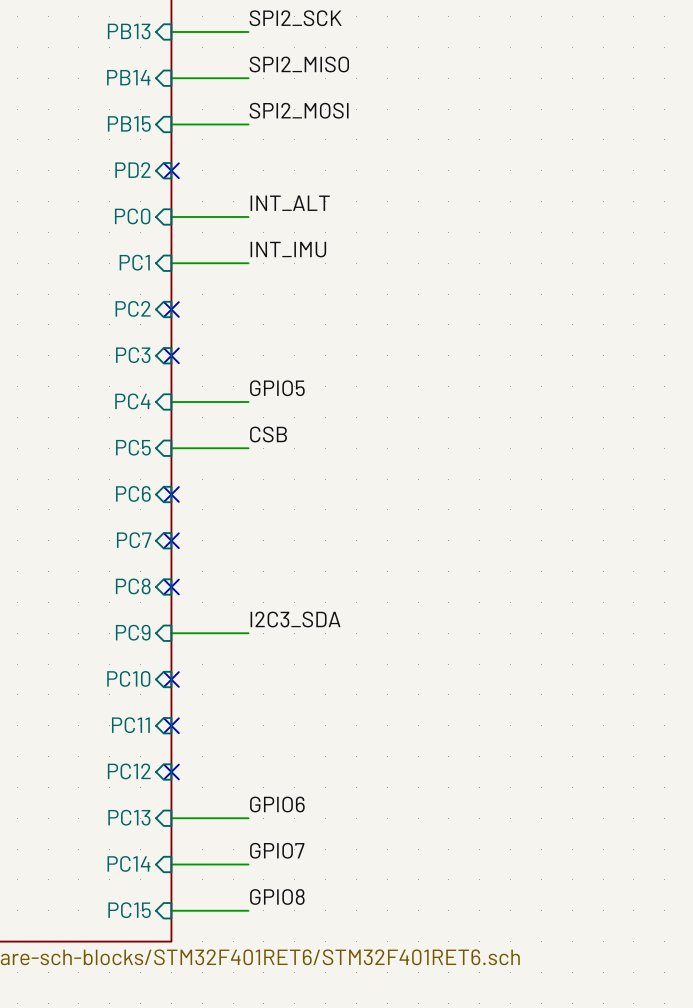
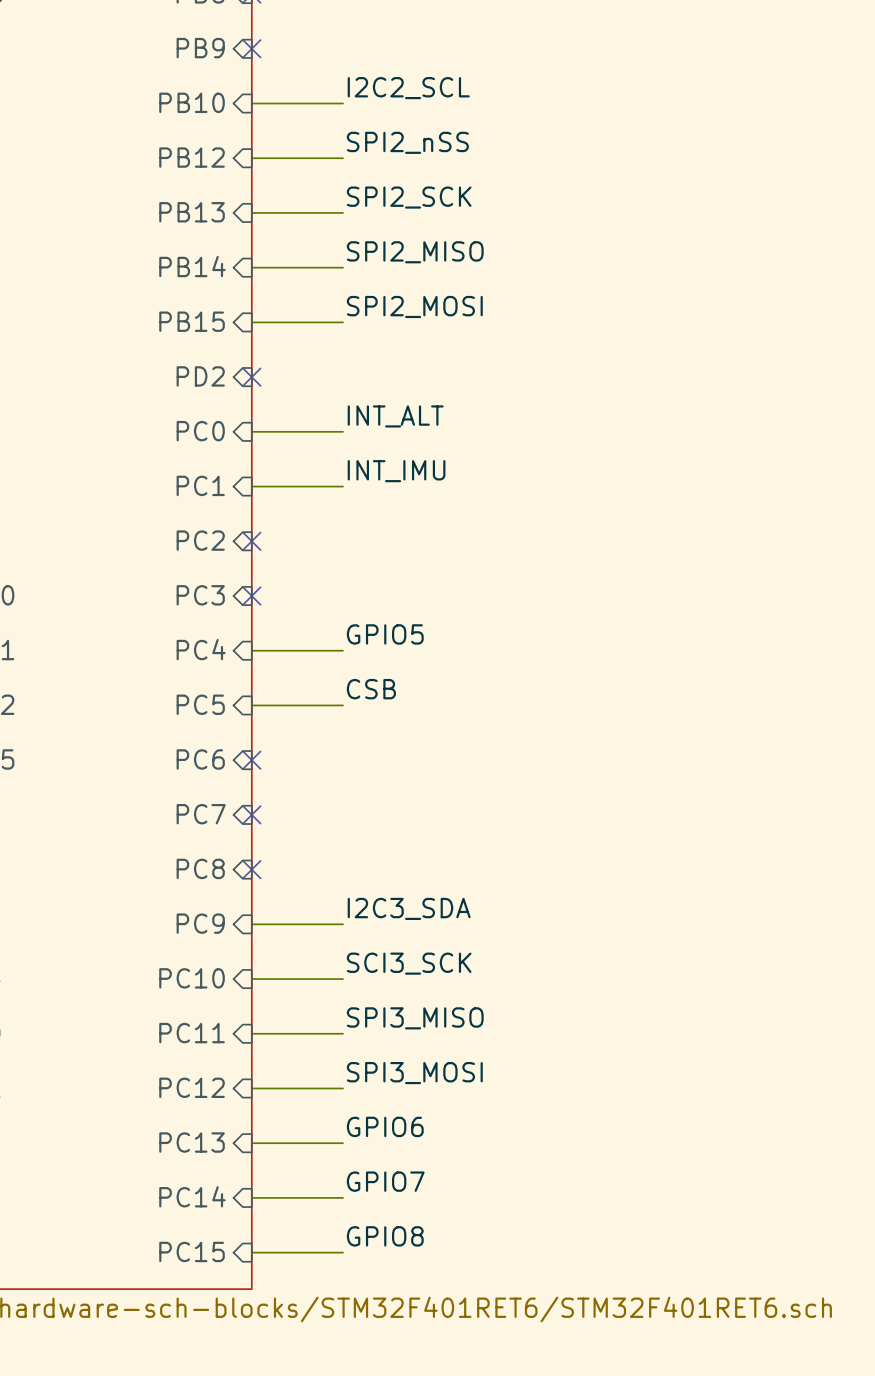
label: none -> SCI3_SCK (409, 963)
wire: none -> (251, 979) (343, 979)
no-connect mark: (171, 679) -> none
label: none -> SPI3_MISO (415, 1018)
wire: none -> (251, 1033) (343, 1033)
no-connect mark: (171, 725) -> none
label: none -> SPI3_MOSI (414, 1073)
wire: none -> (251, 1088) (343, 1088)
no-connect mark: (171, 772) -> none

